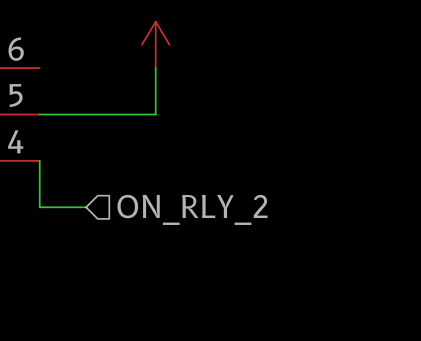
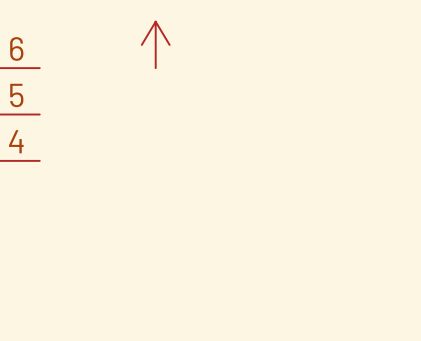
wire: (155, 68) (155, 114) (39, 114) -> none
wire: (39, 160) (39, 207) (86, 207) -> none
hierarchical label: ON_RLY_2 (192, 209) -> none

